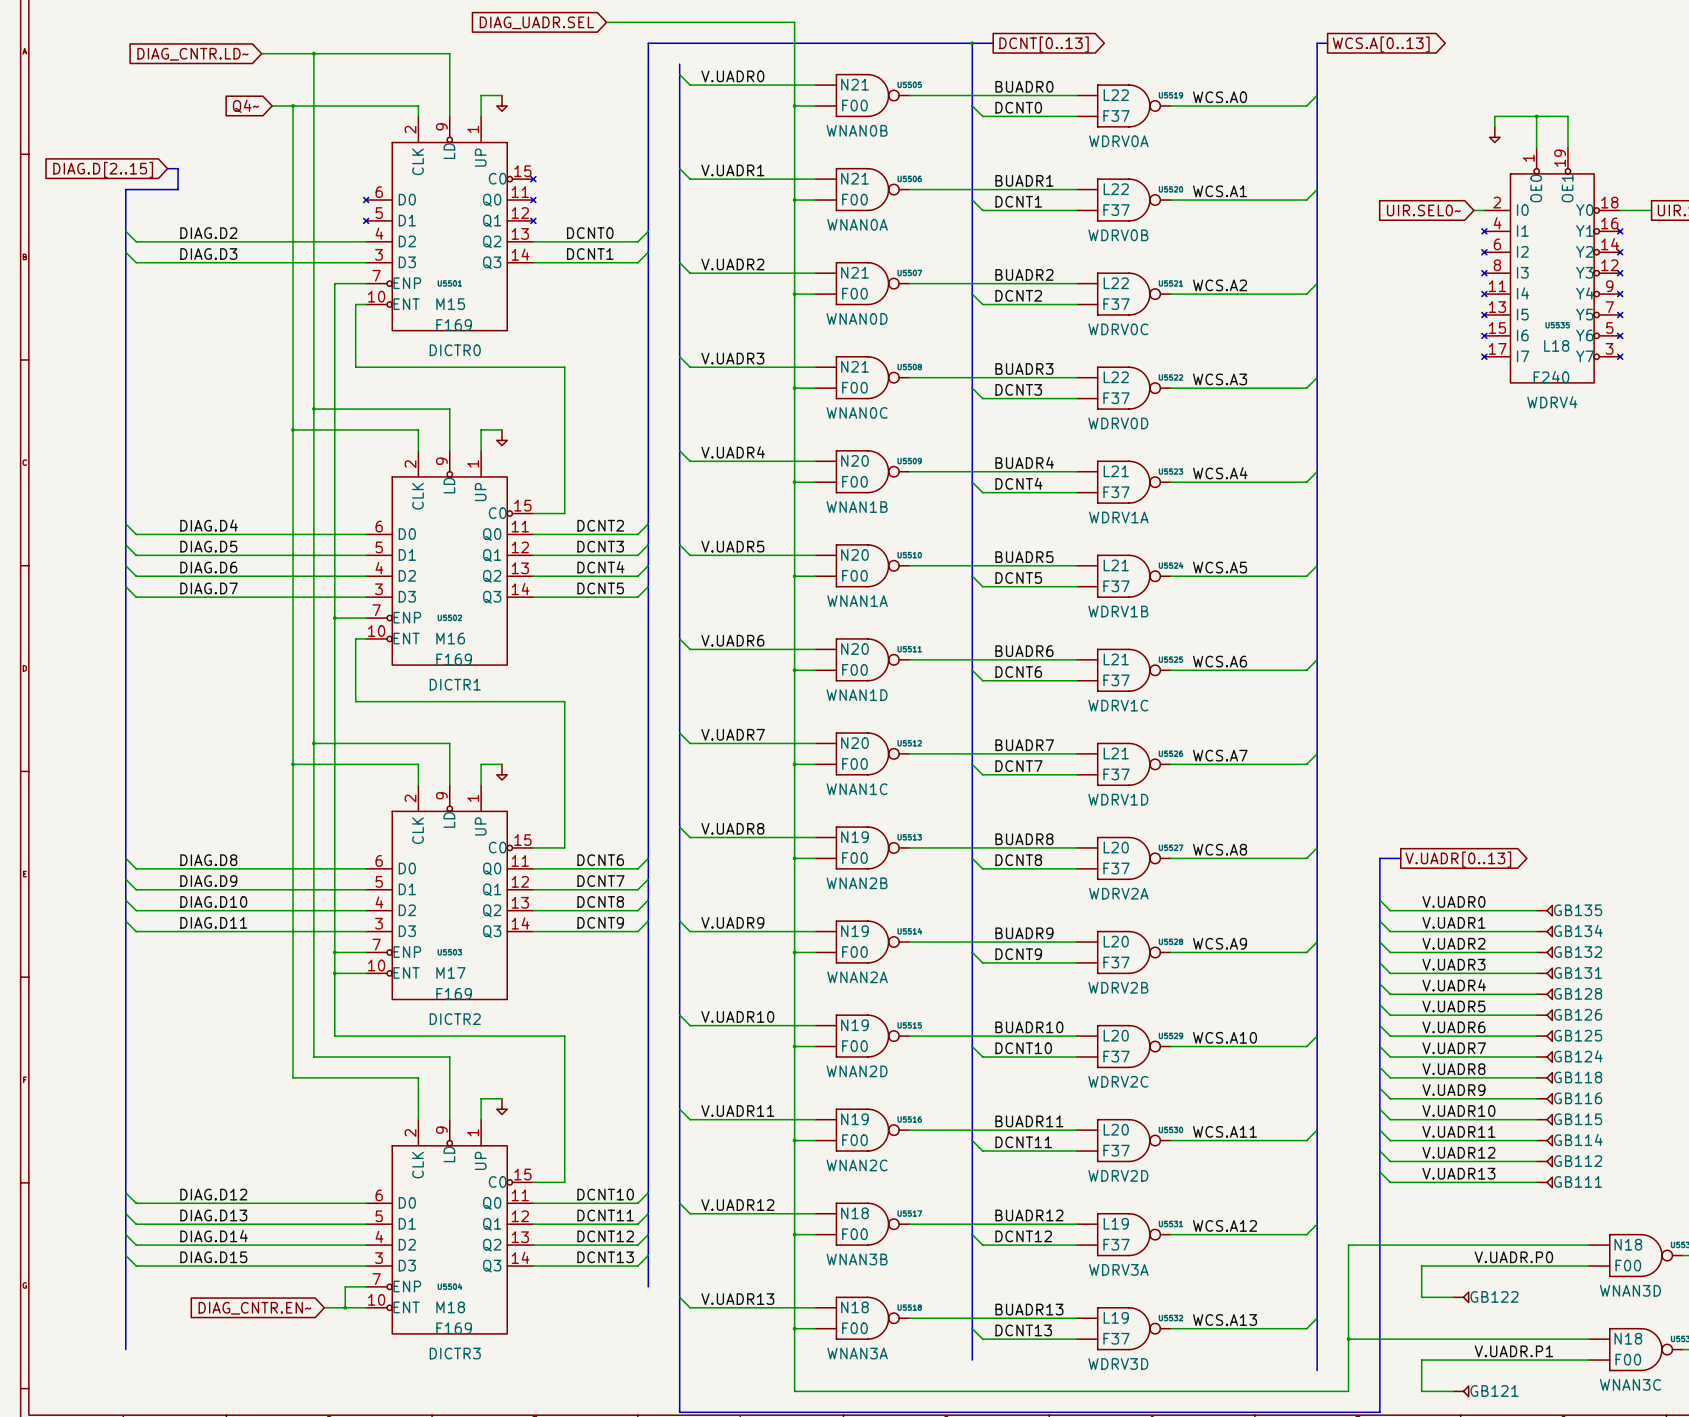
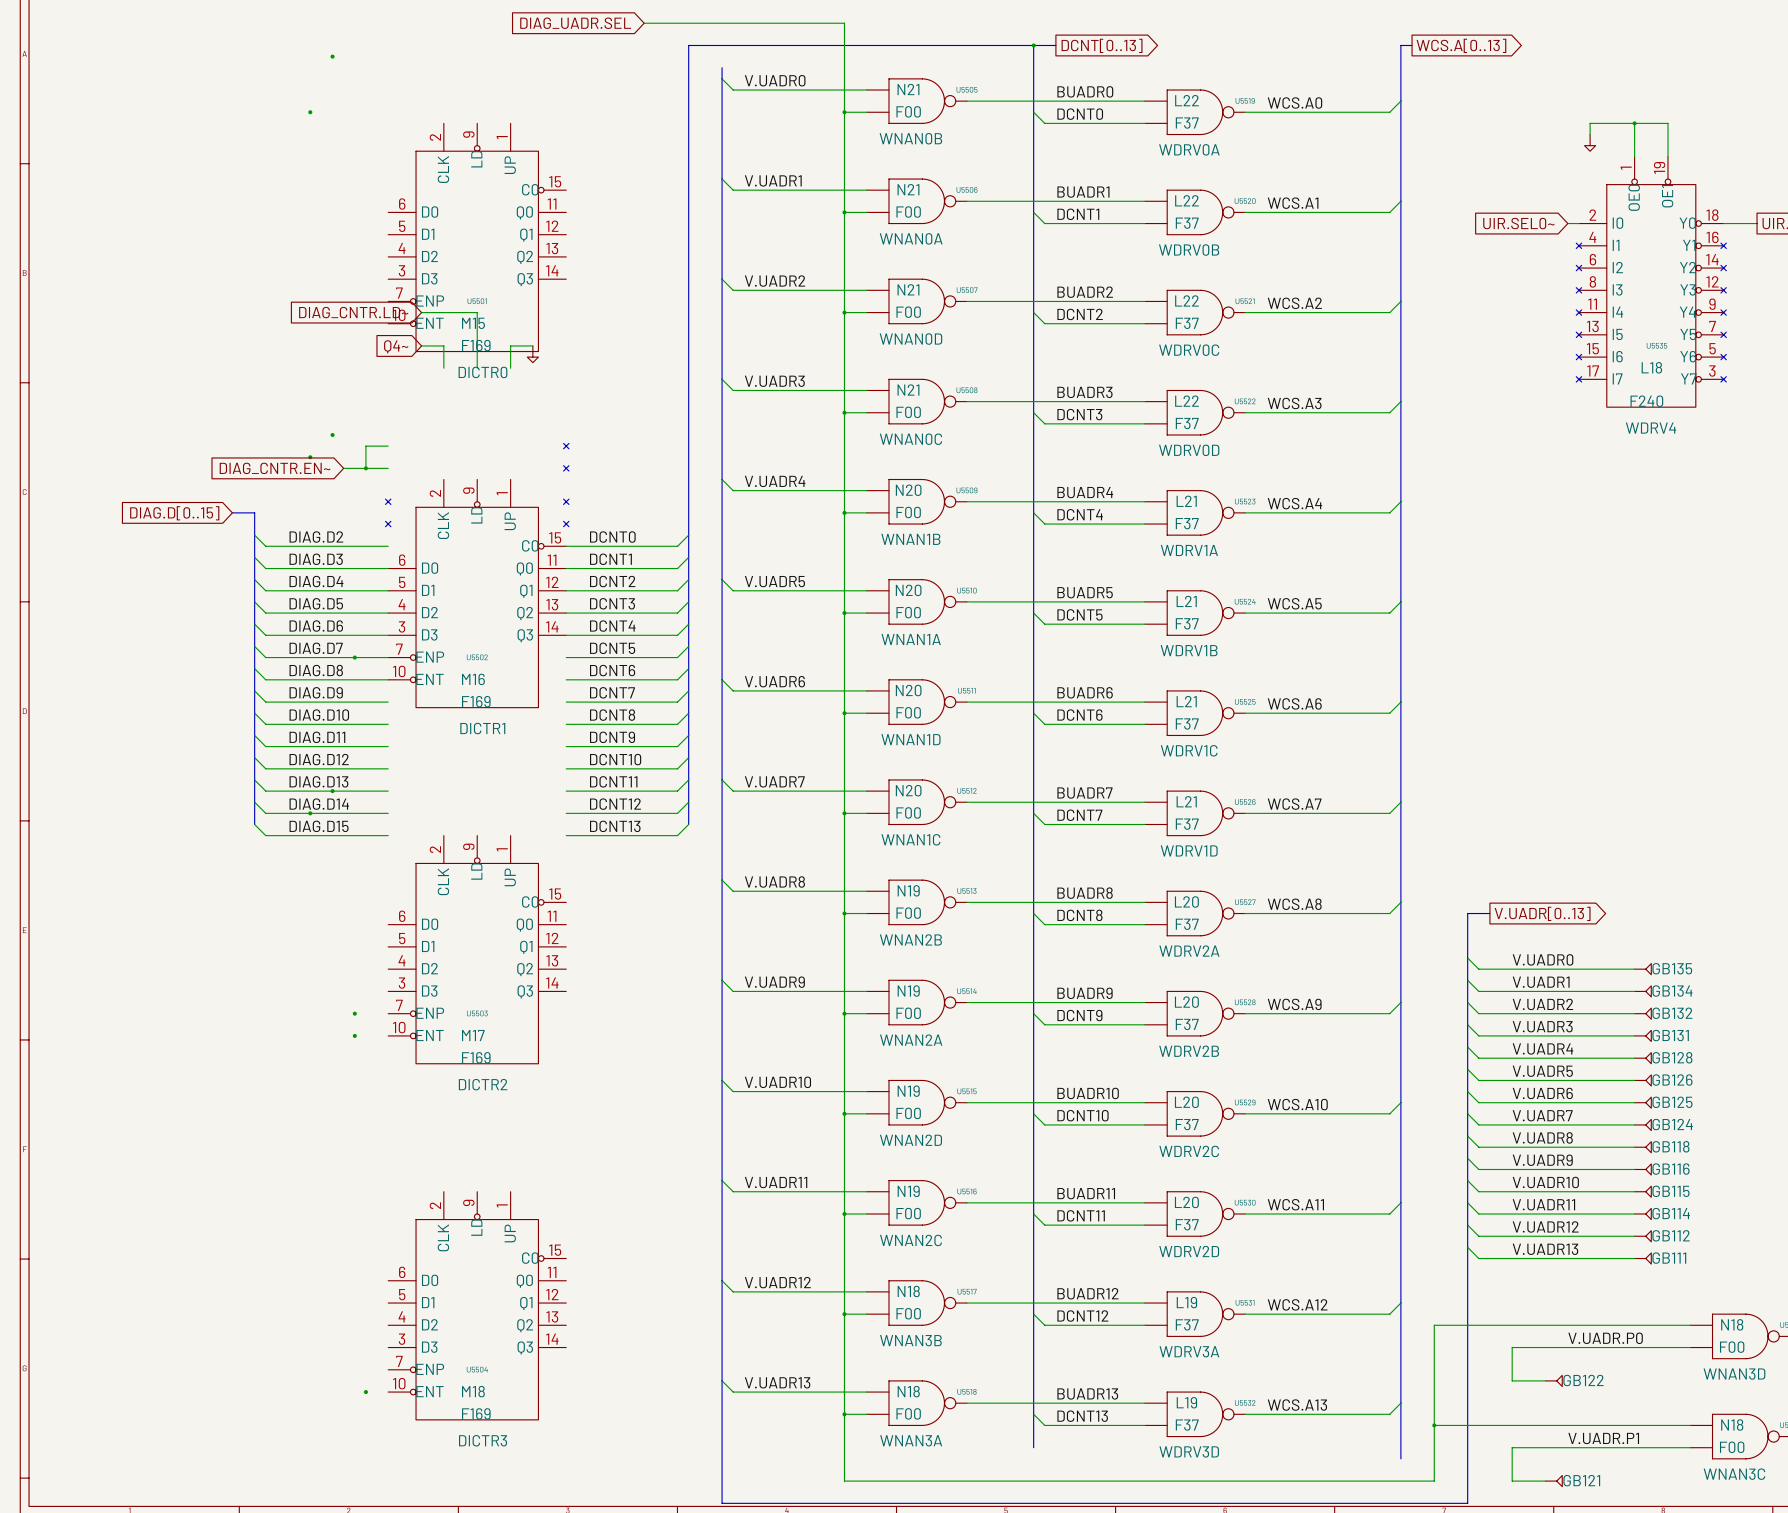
wire: (261, 53) (449, 53) (449, 116) -> none
wire: (313, 53) (313, 1056) (449, 1056) (449, 1119) -> none
global label: DIAG_CNTR.LD~ (192, 54) -> none
wire: (502, 95) (481, 95) (481, 116) -> none
power symbol: (502, 103) -> none
wire: (272, 105) (418, 105) (418, 116) -> none
wire: (292, 105) (292, 1077) (418, 1077) (418, 1119) -> none
global label: Q4~ (245, 106) -> none
bus: (167, 168) (178, 168) (178, 189) (125, 189) (125, 1349) -> none
global label: DIAG.D[2..15] (103, 169) -> none
no-connect mark: (533, 179) -> none
no-connect mark: (366, 200) -> none
no-connect mark: (533, 200) -> none
no-connect mark: (366, 220) -> none
no-connect mark: (533, 220) -> none
wire: (125, 231) (136, 241) (366, 241) -> none
wire: (648, 231) (637, 241) (533, 241) -> none
label: DIAG.D2 (208, 233) -> none
label: DCNT0 (590, 233) -> none
wire: (125, 252) (136, 262) (366, 262) -> none
wire: (648, 252) (637, 262) (533, 262) -> none
label: DIAG.D3 (208, 254) -> none
label: DCNT1 (590, 254) -> none
wire: (366, 283) (334, 283) (334, 1036) (564, 1036) (564, 1182) (533, 1182) -> none
global label: none -> DIAG_CNTR.LD~ (353, 312)
wire: none -> (421, 312) (477, 312) (477, 368)
wire: (366, 304) (355, 304) (355, 367) (564, 367) (564, 513) -> (688, 535) (677, 546) (599, 546)
global label: none -> Q4~ (396, 346)
wire: none -> (421, 345) (443, 345) (443, 368)
wire: none -> (532, 345) (510, 345) (510, 368)
power symbol: none -> (532, 354)
wire: (313, 409) (449, 409) (449, 450) -> none
wire: none -> (388, 446) (365, 446) (365, 468)
no-connect mark: none -> (566, 446)
wire: (292, 429) (418, 429) (418, 450) -> none
wire: (502, 429) (481, 429) (481, 450) -> none
power symbol: (502, 437) -> none
global label: none -> DIAG_CNTR.EN~ (275, 468)
wire: none -> (343, 468) (388, 468)
junction: none -> (365, 468)
no-connect mark: none -> (566, 468)
no-connect mark: none -> (388, 501)
no-connect mark: none -> (566, 501)
bus: none -> (232, 512) (254, 512) (254, 824)
global label: none -> DIAG.D[0..15] (174, 513)
no-connect mark: none -> (388, 524)
no-connect mark: none -> (566, 524)
wire: none -> (254, 535) (265, 546) (388, 546)
label: none -> DIAG.D2 (316, 537)
label: none -> DCNT0 (612, 537)
wire: (125, 523) (136, 534) (251, 534) -> (254, 557) (265, 568)
label position: DIAG.D4 (209, 525) -> DIAG.D4 (316, 581)
label: none -> DIAG.D3 (316, 559)
label: none -> DCNT1 (610, 559)
label position: DCNT2 (600, 525) -> DCNT2 (612, 581)
wire: (125, 544) (136, 555) (251, 555) -> (254, 579) (265, 590)
label position: DIAG.D5 (208, 546) -> DIAG.D5 (316, 603)
label position: DCNT3 (600, 546) -> DCNT3 (612, 603)
wire: (125, 565) (136, 576) (251, 576) -> (254, 601) (265, 613)
label position: DIAG.D6 (208, 567) -> DIAG.D6 (316, 626)
label position: DCNT4 (600, 567) -> DCNT4 (612, 626)
wire: (125, 586) (136, 597) (251, 597) -> (254, 624) (265, 635)
label position: DIAG.D7 (209, 588) -> DIAG.D7 (316, 648)
label position: DCNT5 (600, 588) -> DCNT5 (612, 648)
wire: none -> (254, 646) (265, 657) (354, 657)
wire: none -> (688, 646) (677, 657) (566, 657)
wire: none -> (254, 668) (265, 679) (377, 679)
wire: none -> (688, 668) (677, 679) (566, 679)
label: none -> DIAG.D8 (316, 670)
label: none -> DCNT6 (612, 670)
wire: (355, 638) (355, 701) -> (254, 735) (265, 746) (377, 746)
wire: none -> (254, 690) (265, 702) (388, 702)
wire: none -> (688, 690) (677, 702) (566, 702)
label: none -> DIAG.D9 (316, 692)
label: none -> DCNT7 (612, 692)
wire: none -> (254, 713) (265, 724) (388, 724)
wire: none -> (688, 713) (677, 724) (566, 724)
label: none -> DIAG.D10 (319, 715)
label: none -> DCNT8 (612, 715)
label: none -> DIAG.D11 (317, 737)
label: none -> DCNT9 (612, 737)
wire: (366, 701) (533, 701) -> none
wire: (564, 701) (564, 847) (533, 847) -> (599, 746) (677, 746) (688, 735)
wire: none -> (254, 757) (265, 768) (388, 768)
wire: none -> (688, 757) (677, 768) (566, 768)
label: none -> DIAG.D12 (319, 759)
label: none -> DCNT10 (615, 759)
wire: none -> (254, 779) (265, 791) (332, 791)
wire: none -> (688, 779) (677, 791) (566, 791)
label: none -> DIAG.D13 (318, 781)
label: none -> DCNT11 (613, 781)
wire: (366, 743) (449, 743) (449, 785) -> none
wire: none -> (254, 802) (265, 813) (310, 813)
wire: none -> (688, 802) (677, 813) (566, 813)
label: none -> DIAG.D14 (319, 804)
label: none -> DCNT12 (615, 804)
wire: (366, 764) (418, 764) (418, 785) -> none
wire: (502, 764) (481, 764) (481, 785) -> none
power symbol: (502, 772) -> none
wire: none -> (254, 824) (265, 835) (388, 835)
bus: (648, 774) (648, 1286) -> none
label: none -> DIAG.D15 (319, 826)
label: none -> DCNT13 (615, 826)
wire: (125, 858) (136, 868) (366, 868) -> none
wire: (648, 858) (637, 868) (533, 868) -> (688, 824) (677, 835) (566, 835)
label: DIAG.D8 (208, 860) -> none
label: DCNT6 (600, 860) -> none
wire: (125, 879) (136, 889) (366, 889) -> none
wire: (648, 879) (637, 889) (533, 889) -> none
label: DIAG.D9 (208, 881) -> none
label: DCNT7 (600, 881) -> none
wire: (125, 900) (136, 910) (366, 910) -> none
wire: (648, 900) (637, 910) (533, 910) -> none
label: DIAG.D10 (213, 901) -> none
label: DCNT8 (600, 901) -> none
wire: (125, 921) (136, 931) (366, 931) -> none
wire: (648, 921) (637, 931) (533, 931) -> none
label: DIAG.D11 (213, 922) -> none
label: DCNT9 (600, 922) -> none
wire: (334, 952) (366, 952) -> none
wire: (334, 973) (366, 973) -> none
wire: (502, 1098) (481, 1098) (481, 1119) -> none
power symbol: (502, 1106) -> none
wire: (125, 1192) (136, 1203) (366, 1203) -> none
wire: (648, 1192) (637, 1203) (533, 1203) -> none
label: DIAG.D12 (213, 1194) -> none
label: DCNT10 (605, 1194) -> none
wire: (125, 1213) (136, 1224) (366, 1224) -> none
wire: (648, 1213) (637, 1224) (533, 1224) -> none
label: DIAG.D13 (213, 1215) -> none
label: DCNT11 (605, 1215) -> none
wire: (125, 1234) (136, 1245) (366, 1245) -> none
wire: (648, 1234) (637, 1245) (533, 1245) -> none
label: DIAG.D14 (214, 1236) -> none
label: DCNT12 (605, 1236) -> none
wire: (125, 1255) (136, 1265) (366, 1265) -> none
wire: (648, 1255) (637, 1265) (533, 1265) -> none
label: DIAG.D15 (213, 1257) -> none
label: DCNT13 (605, 1257) -> none
wire: (366, 1286) (345, 1286) (345, 1307) -> none
wire: (324, 1307) (366, 1307) -> none
global label: DIAG_CNTR.EN~ (254, 1308) -> none

